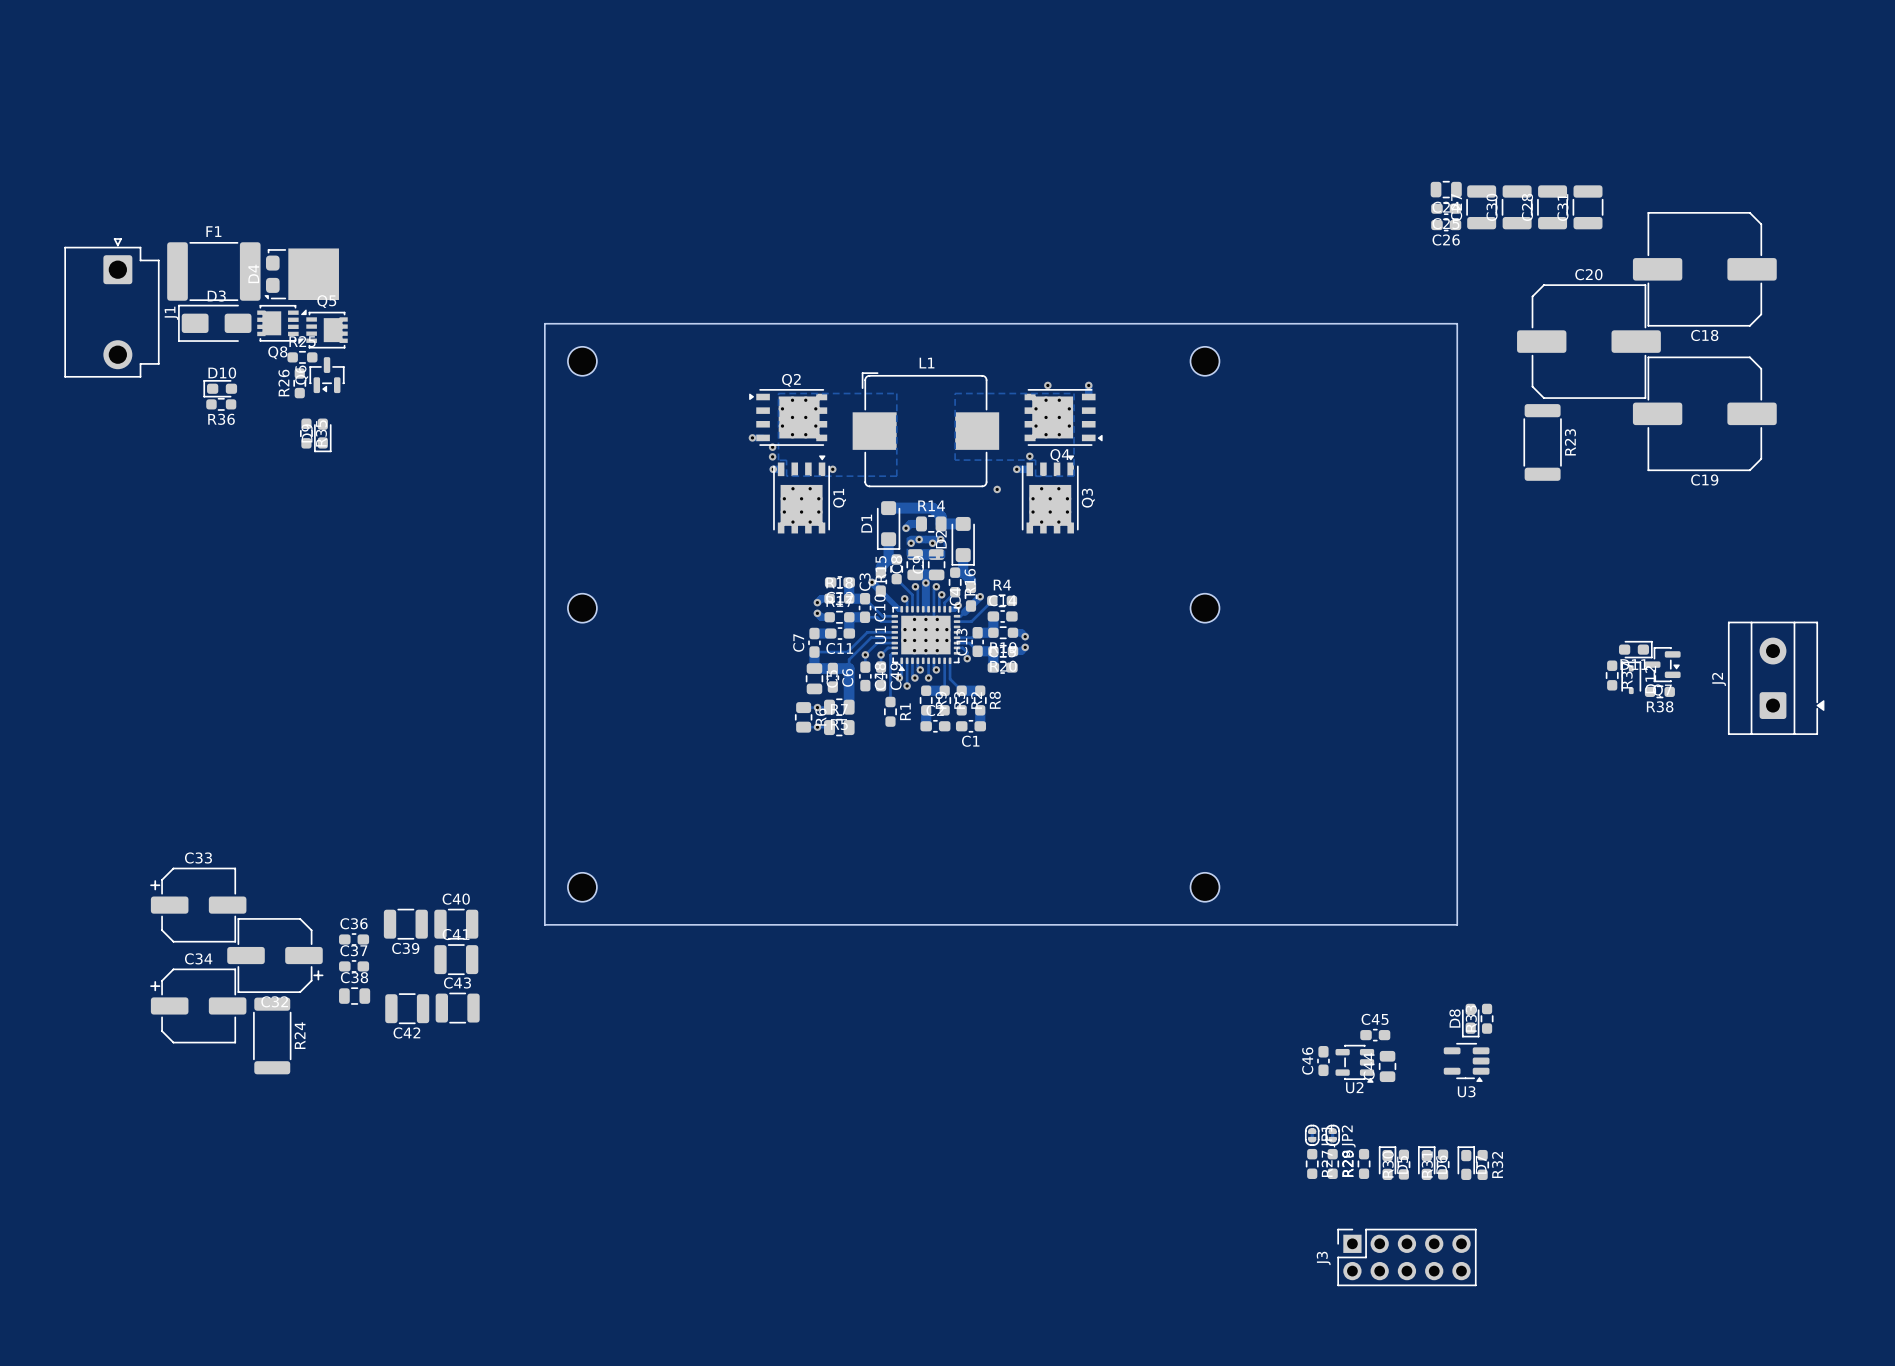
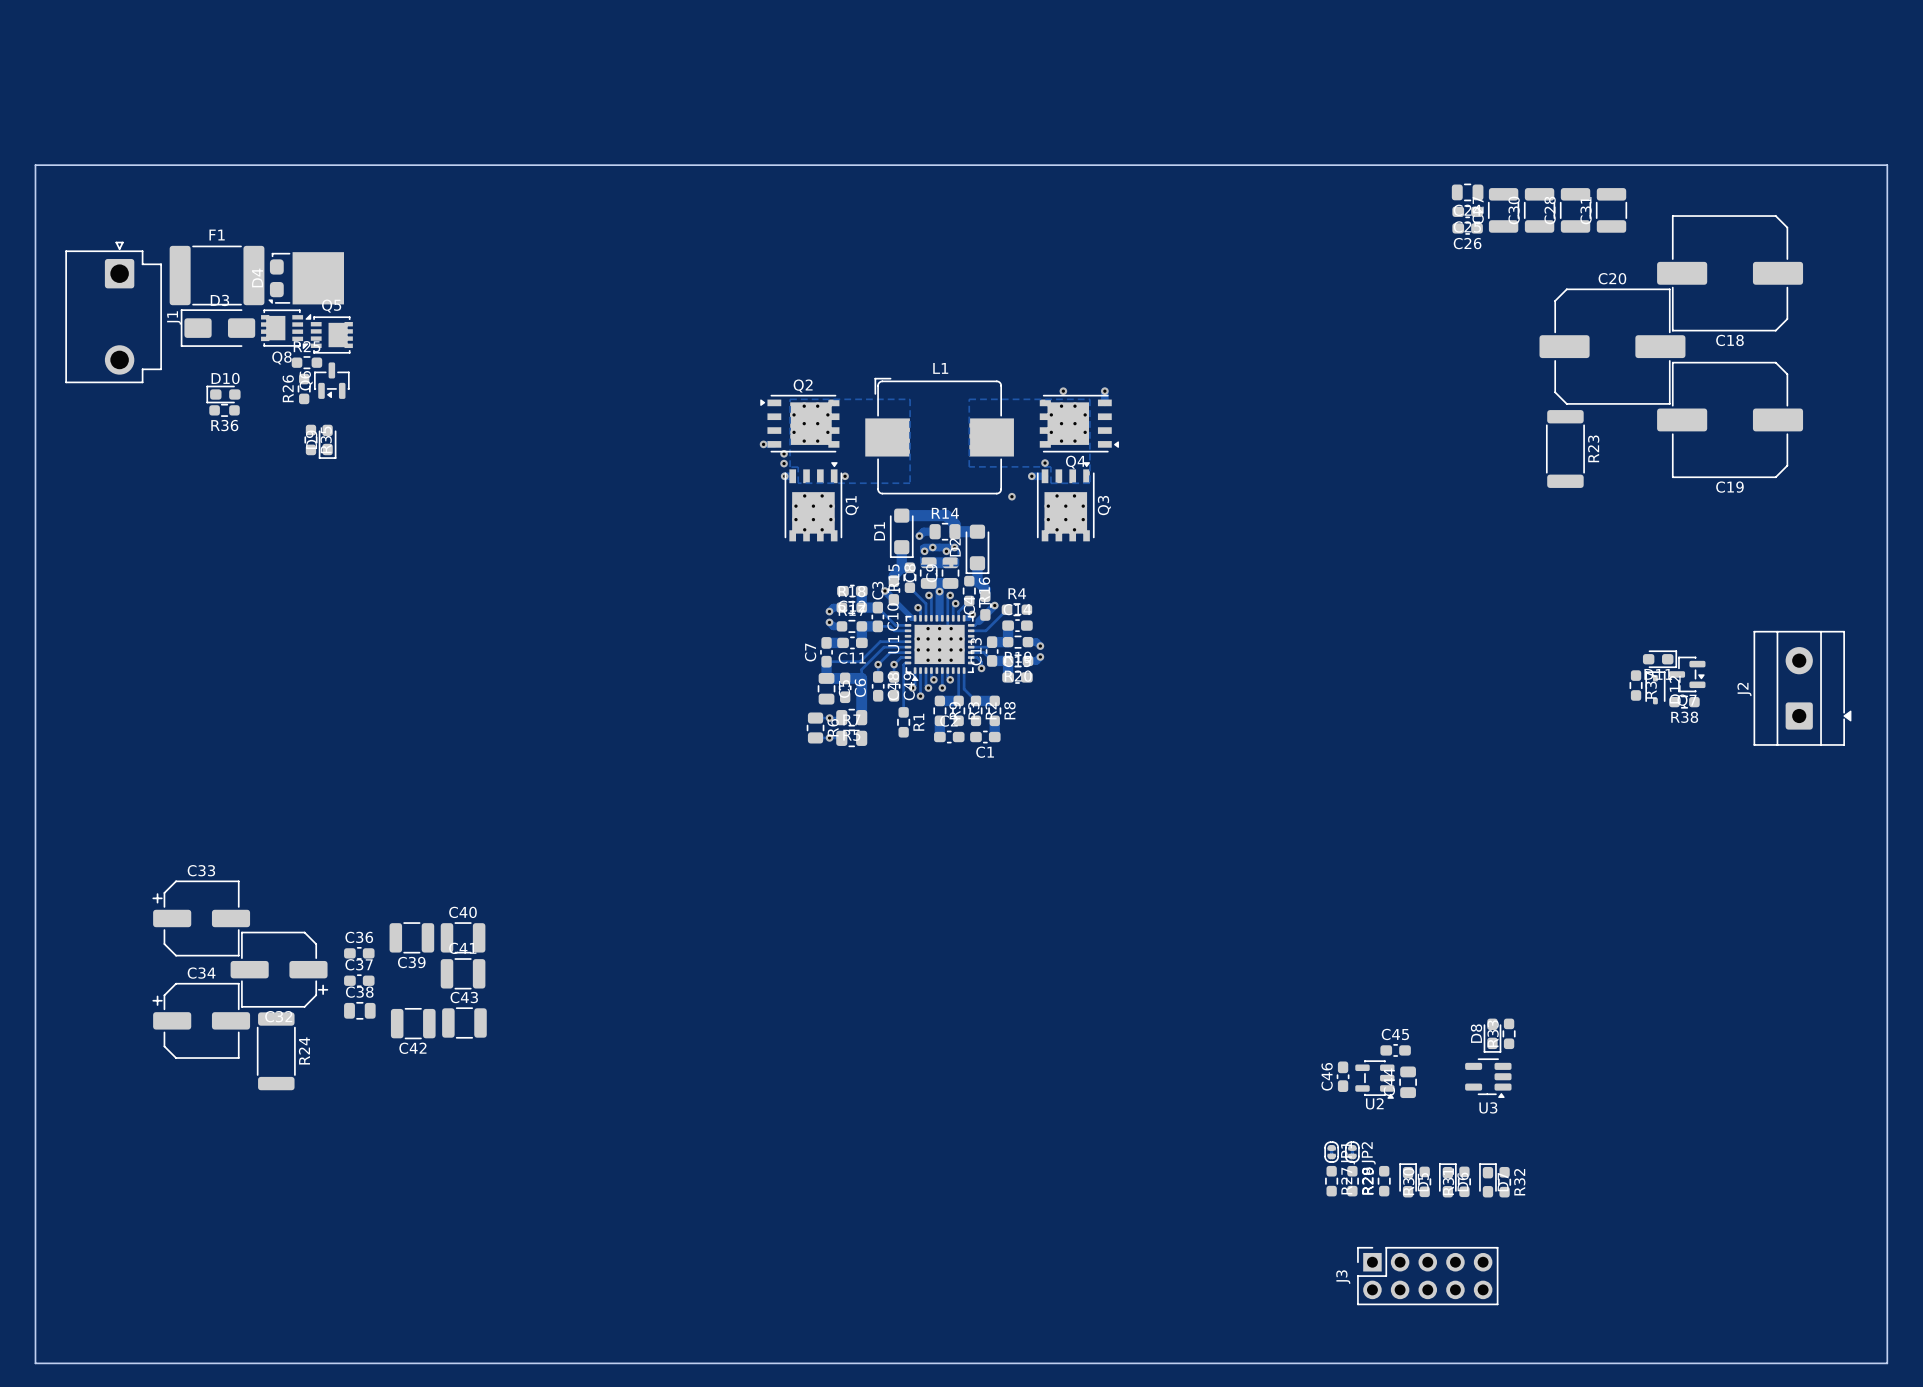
board edge: none -> (35, 165) (1887, 165) (1887, 1363) (35, 1363) (35, 165)
board edge: (544, 323) (1457, 323) (1457, 924) (544, 924) (544, 323) -> none
part: (582, 361) -> none
part: (1204, 361) -> none
part: (582, 608) -> none
part: (1204, 608) -> none
part: (582, 887) -> none
part: (1204, 887) -> none

